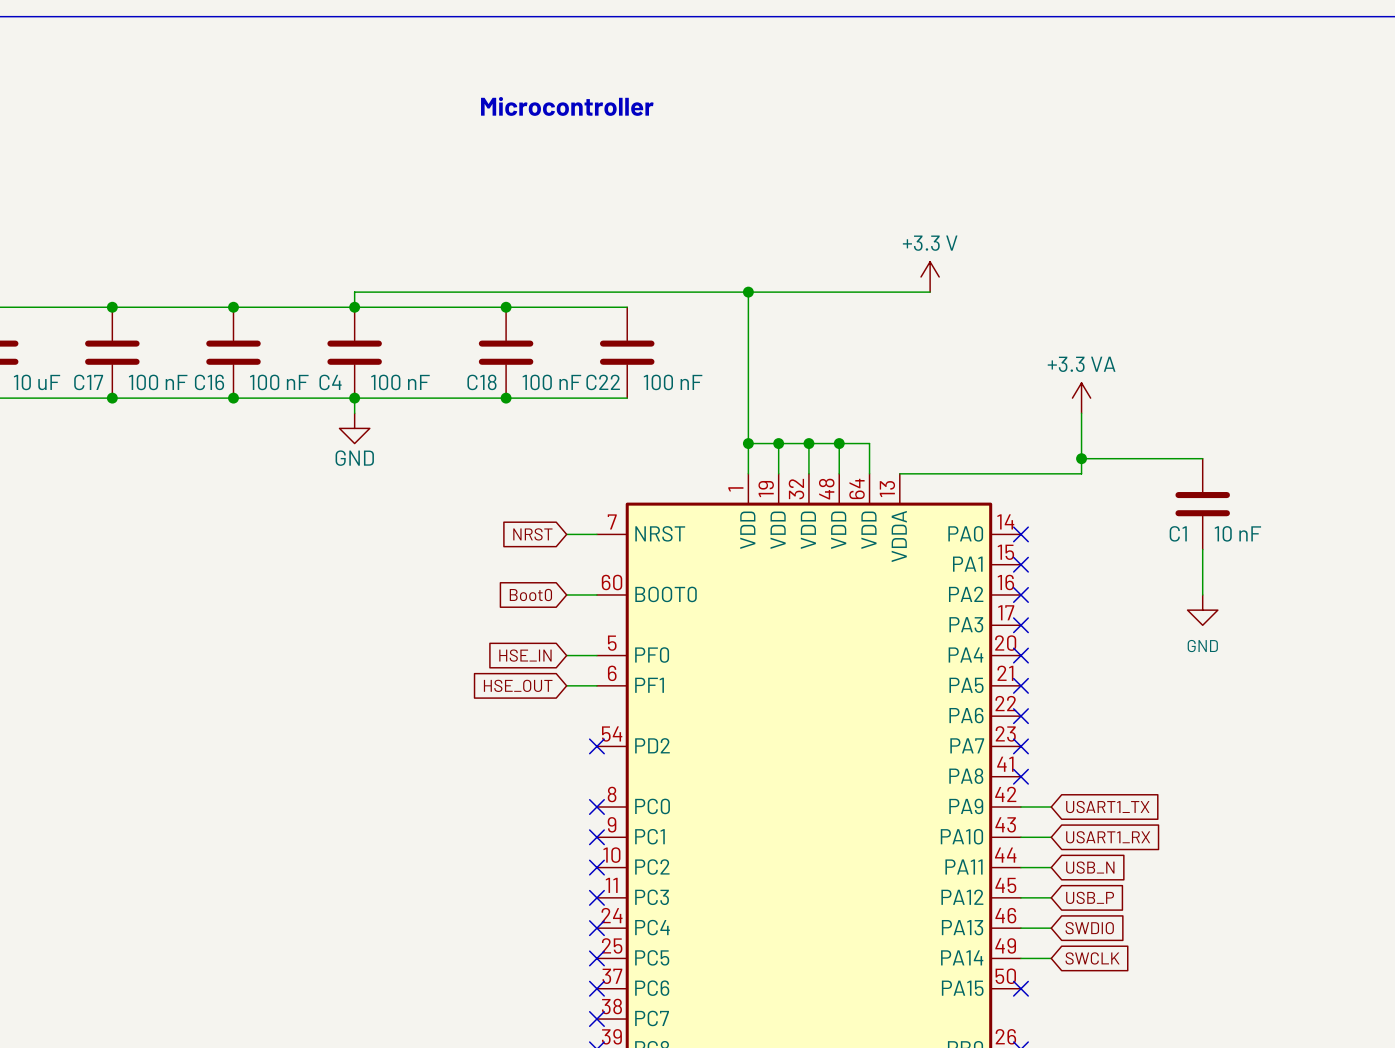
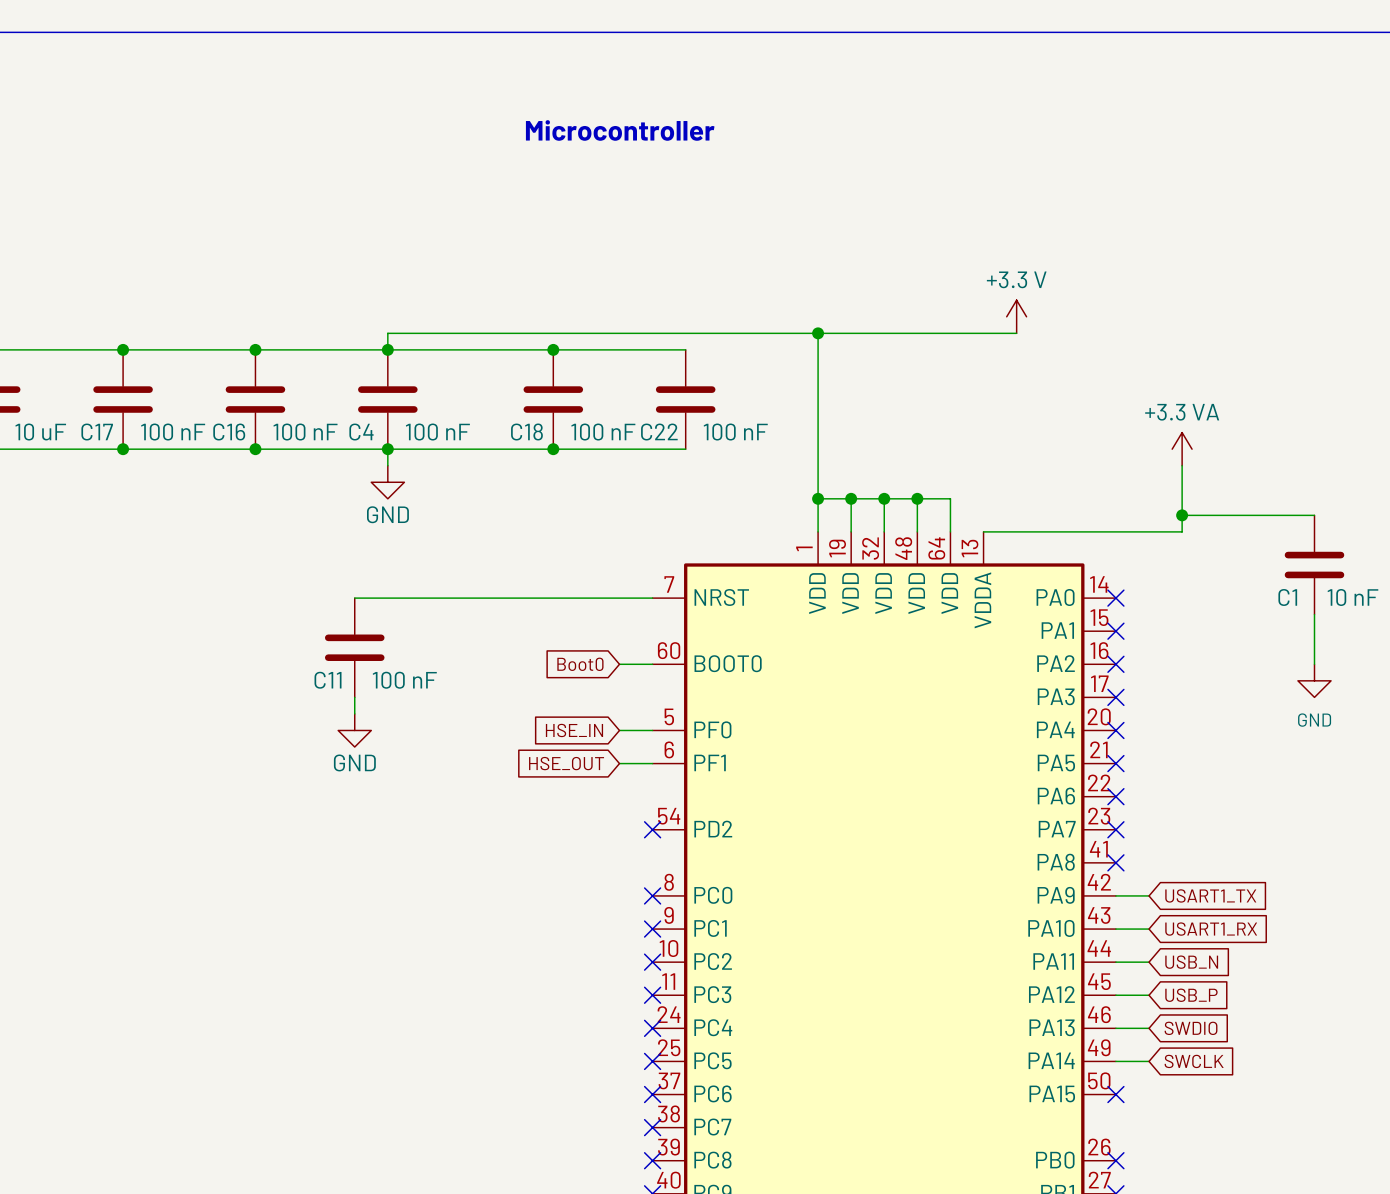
wire: none -> (354, 598) (619, 598)
global label: NRST (532, 534) -> none
C11: none -> 100 nF (354, 647)
wire: none -> (354, 697) (354, 713)
power symbol: none -> GND (354, 730)

